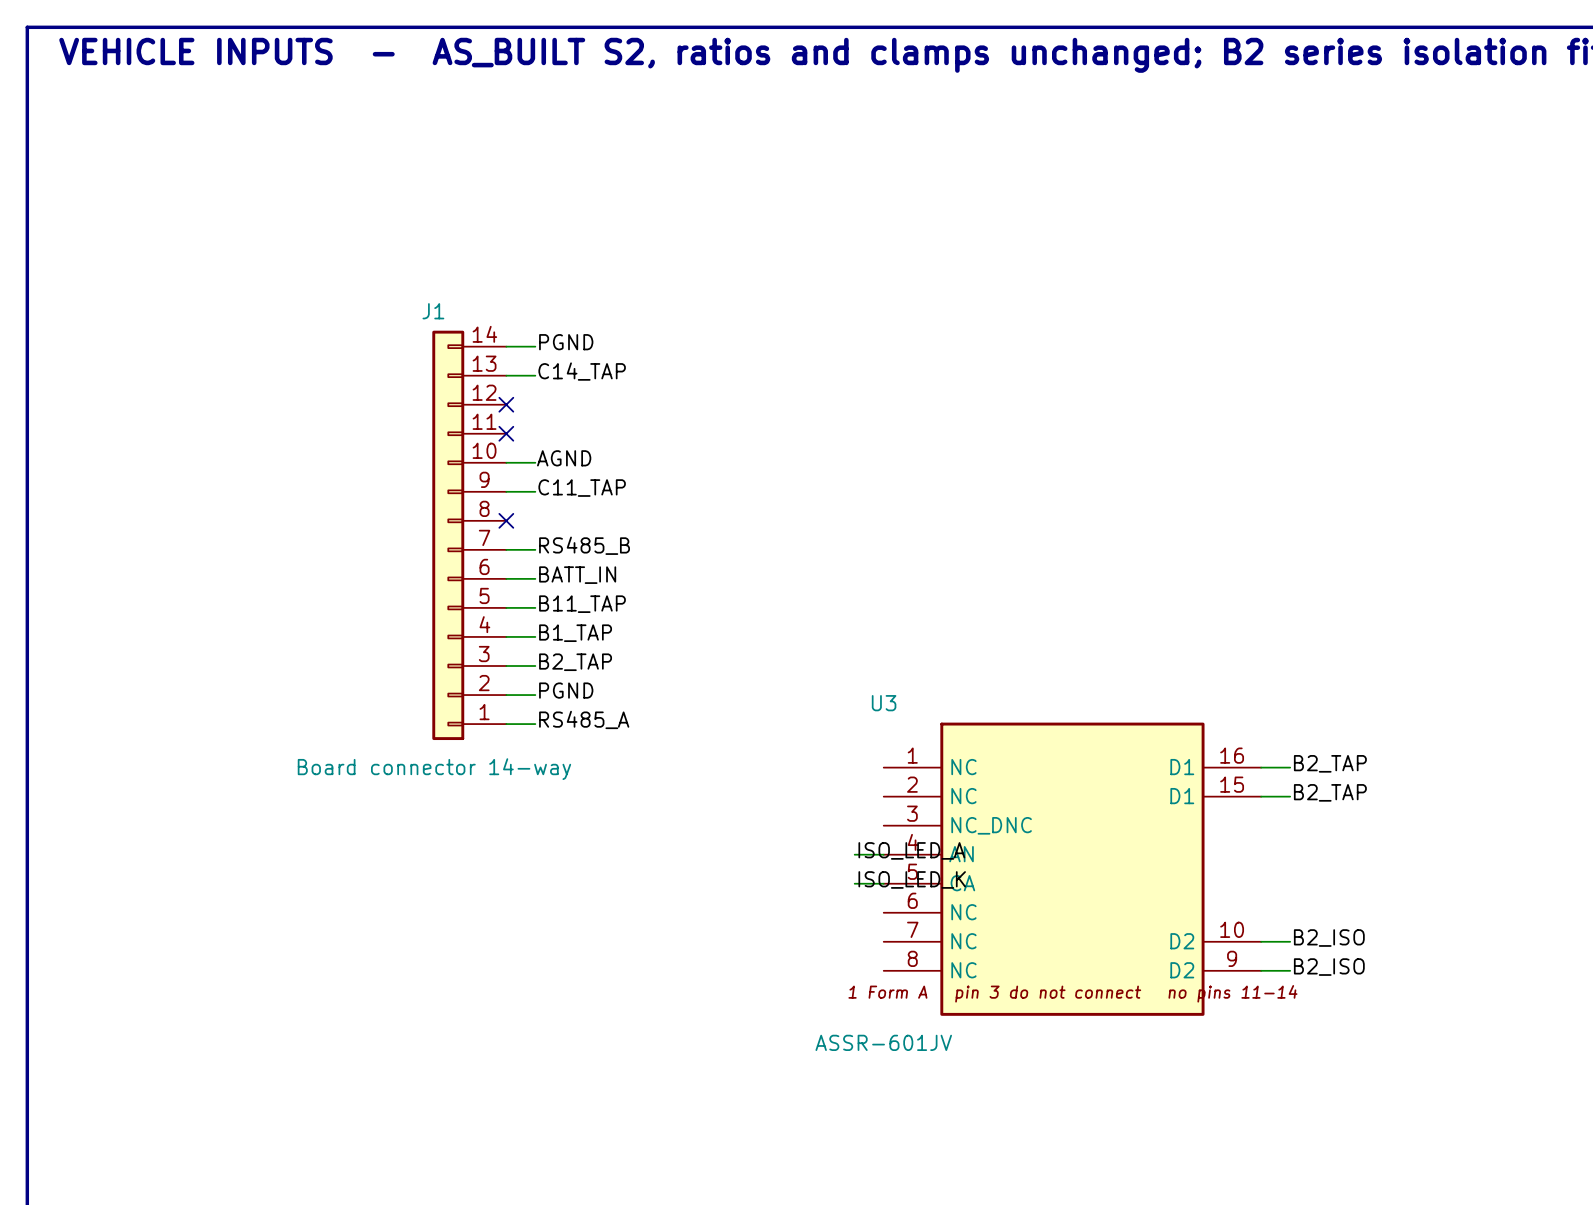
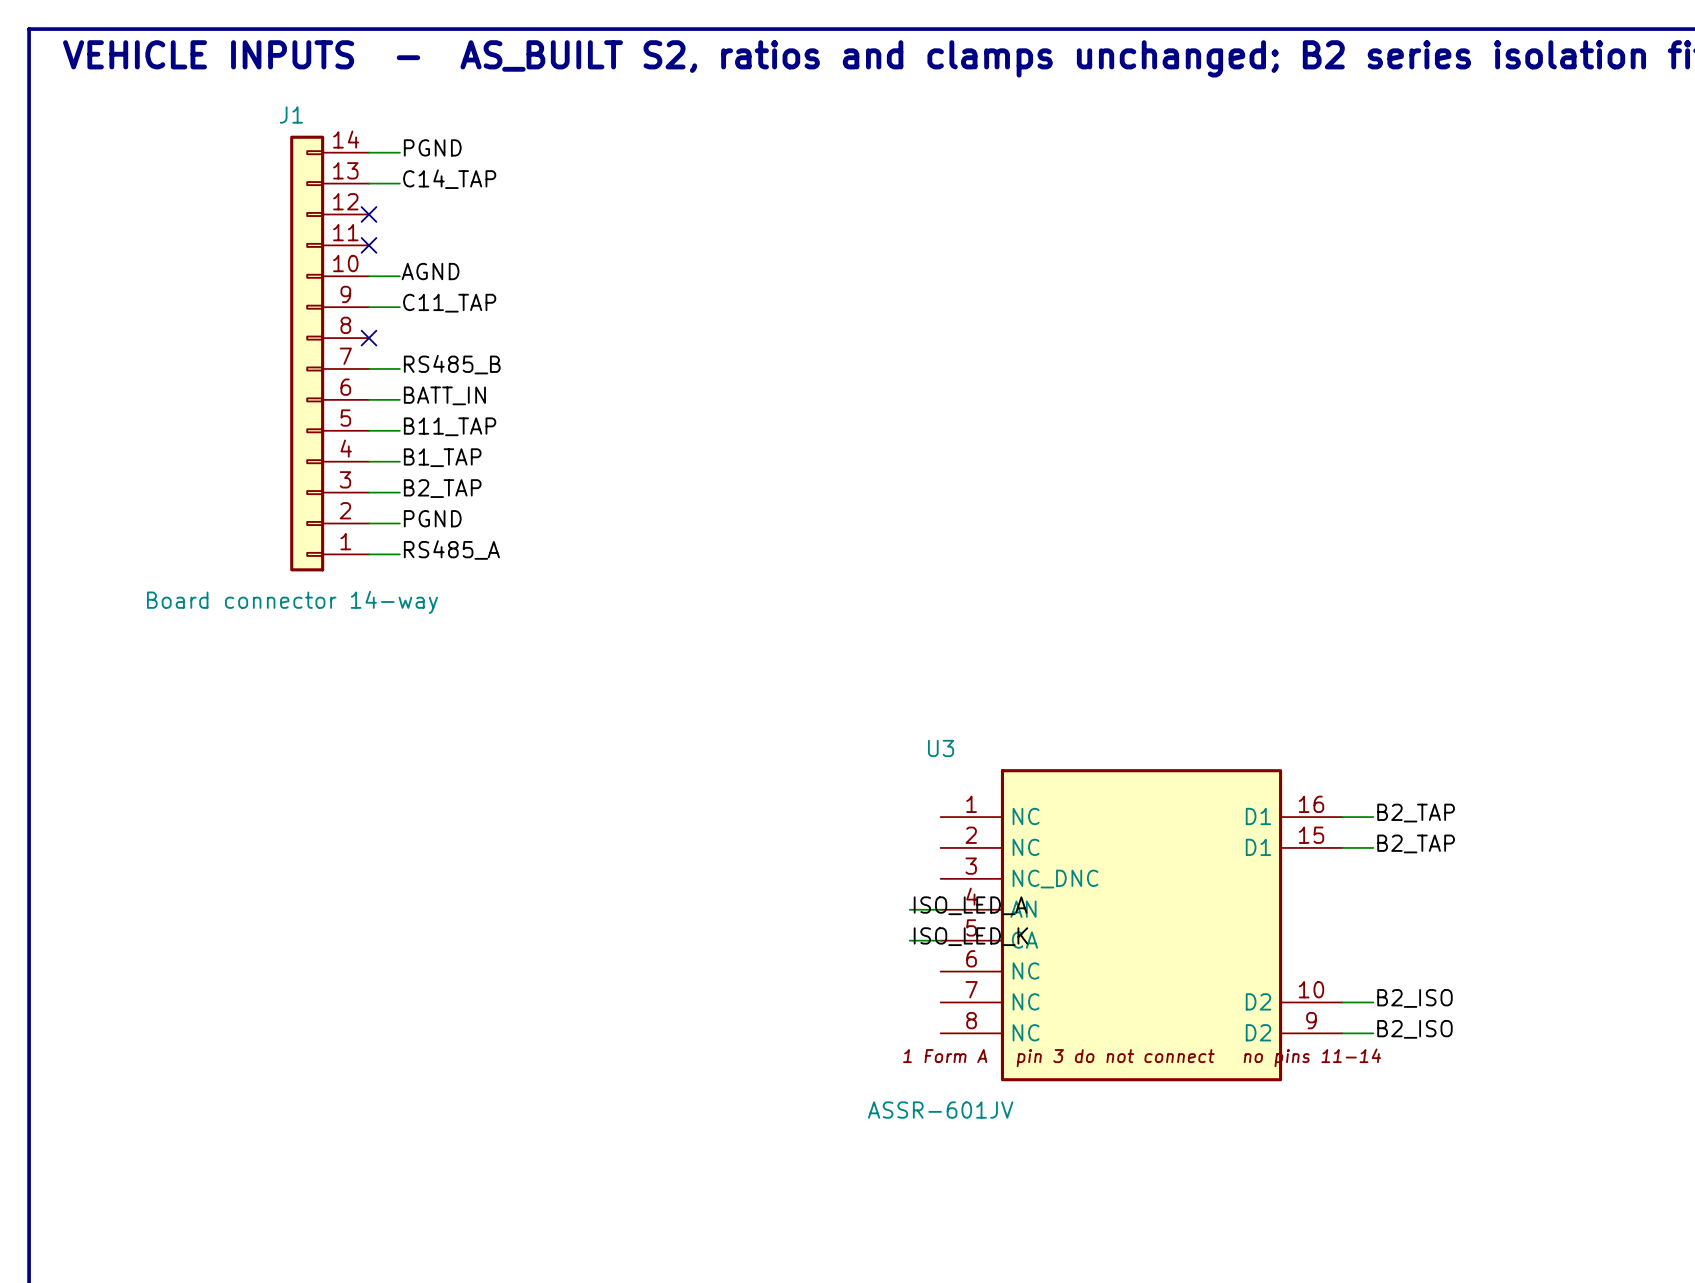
label: none -> PGND (432, 147)
no-connect mark: none -> (368, 214)
no-connect mark: none -> (368, 245)
no-connect mark: none -> (368, 338)
label: PGND (566, 342) -> none
wire: (506, 346) (535, 346) -> (368, 152) (399, 152)
label position: C14_TAP (582, 371) -> C14_TAP (449, 179)
wire: (506, 375) (535, 375) -> (368, 183) (399, 183)
no-connect mark: (506, 404) -> none
no-connect mark: (506, 433) -> none
label position: AGND (564, 458) -> AGND (430, 271)
wire: (506, 462) (535, 462) -> (368, 276) (399, 276)
label: none -> PGND (432, 518)
label position: C11_TAP (582, 488) -> C11_TAP (449, 303)
wire: (506, 491) (535, 491) -> (368, 307) (399, 307)
no-connect mark: (506, 520) -> none
J1 position: (469, 535) -> (329, 353)
label position: RS485_B (584, 545) -> RS485_B (452, 364)
wire: (506, 549) (535, 549) -> (368, 368) (399, 368)
label position: BATT_IN (577, 575) -> BATT_IN (444, 395)
wire: (506, 578) (535, 578) -> (368, 399) (399, 399)
label position: B11_TAP (582, 604) -> B11_TAP (450, 426)
wire: (506, 607) (535, 607) -> (368, 430) (399, 430)
label position: B1_TAP (575, 633) -> B1_TAP (442, 457)
wire: (506, 636) (535, 636) -> (368, 461) (399, 461)
label position: B2_TAP (575, 662) -> B2_TAP (442, 488)
wire: (506, 666) (535, 666) -> (368, 492) (399, 492)
label: PGND (566, 690) -> none
wire: (506, 695) (535, 695) -> (368, 523) (399, 523)
label position: RS485_A (584, 719) -> RS485_A (451, 550)
wire: (506, 724) (535, 724) -> (368, 554) (399, 554)

